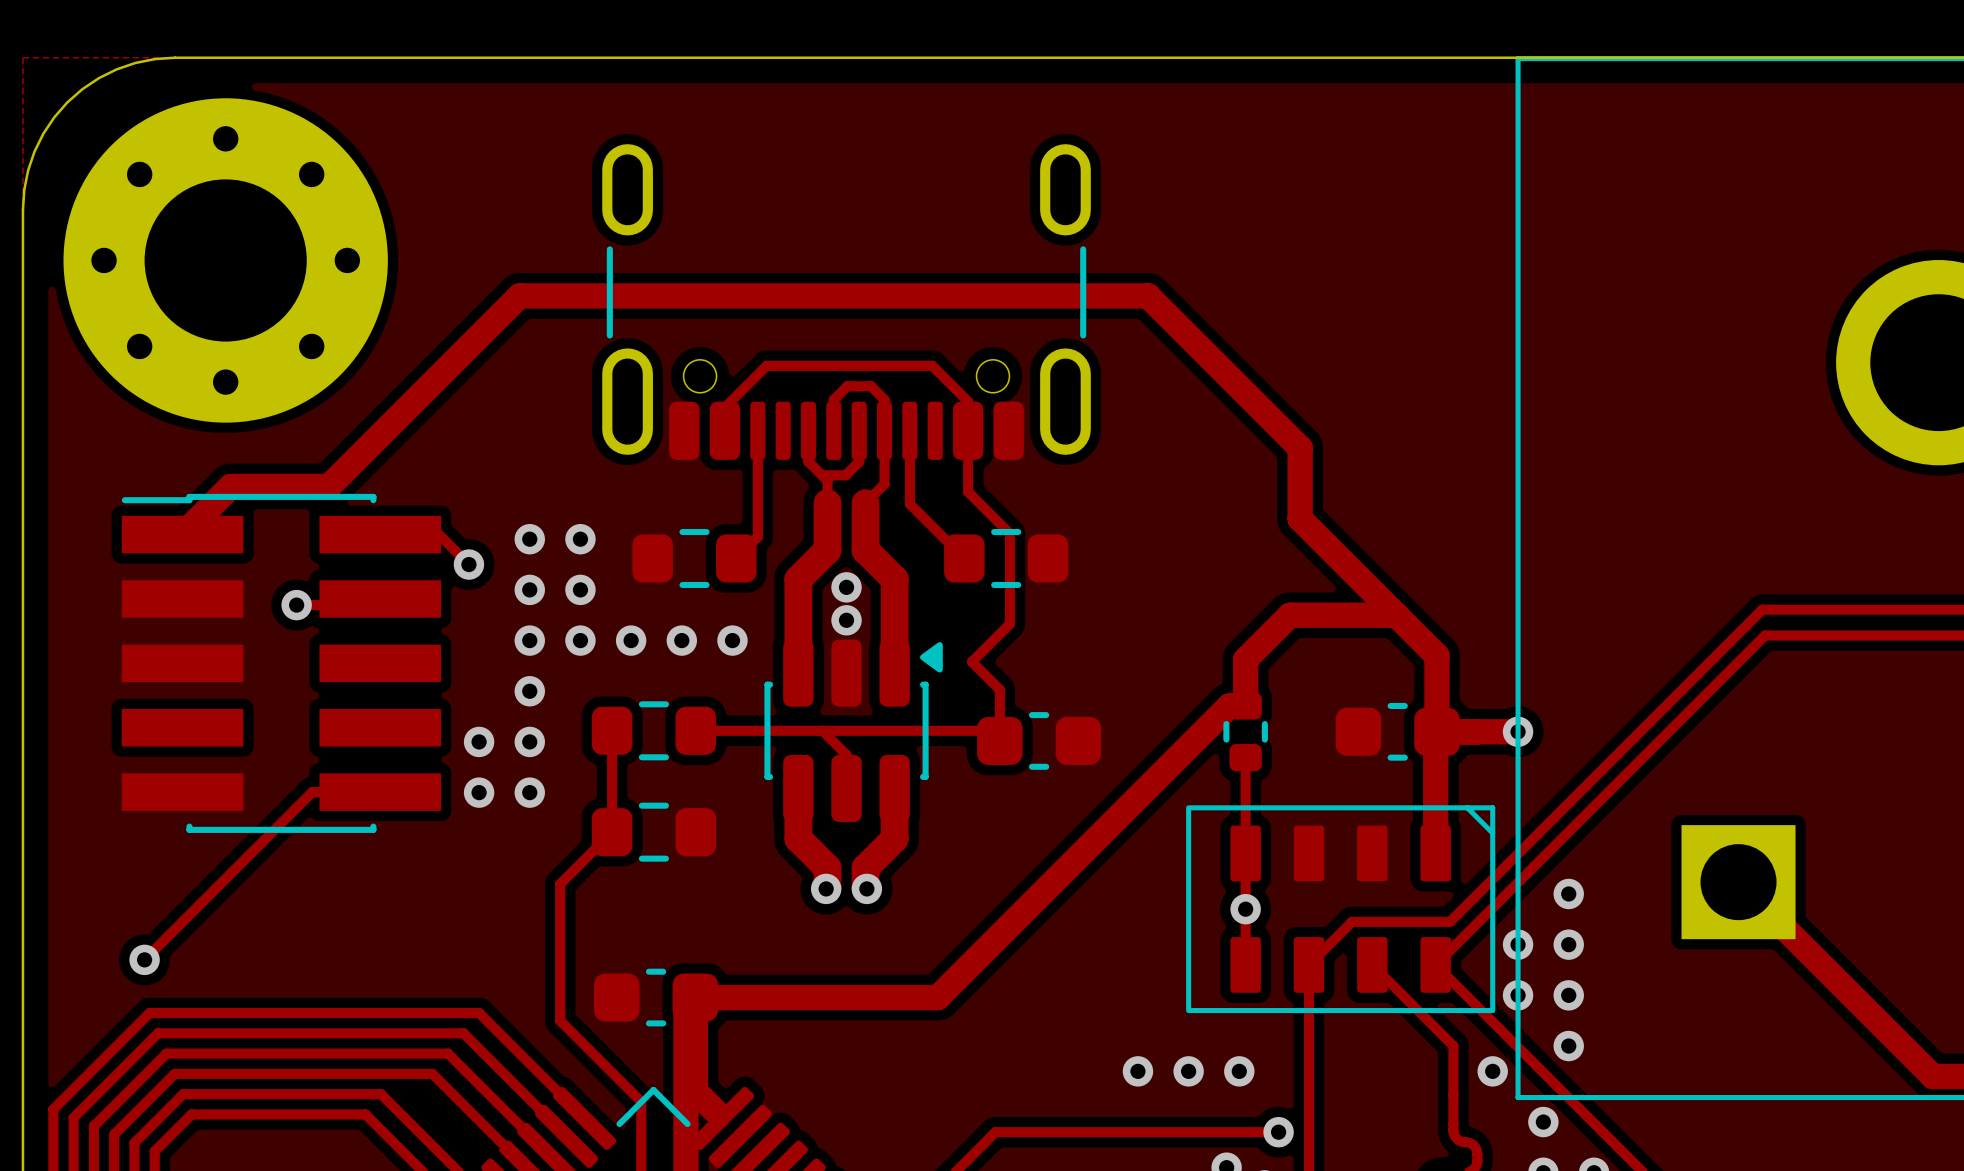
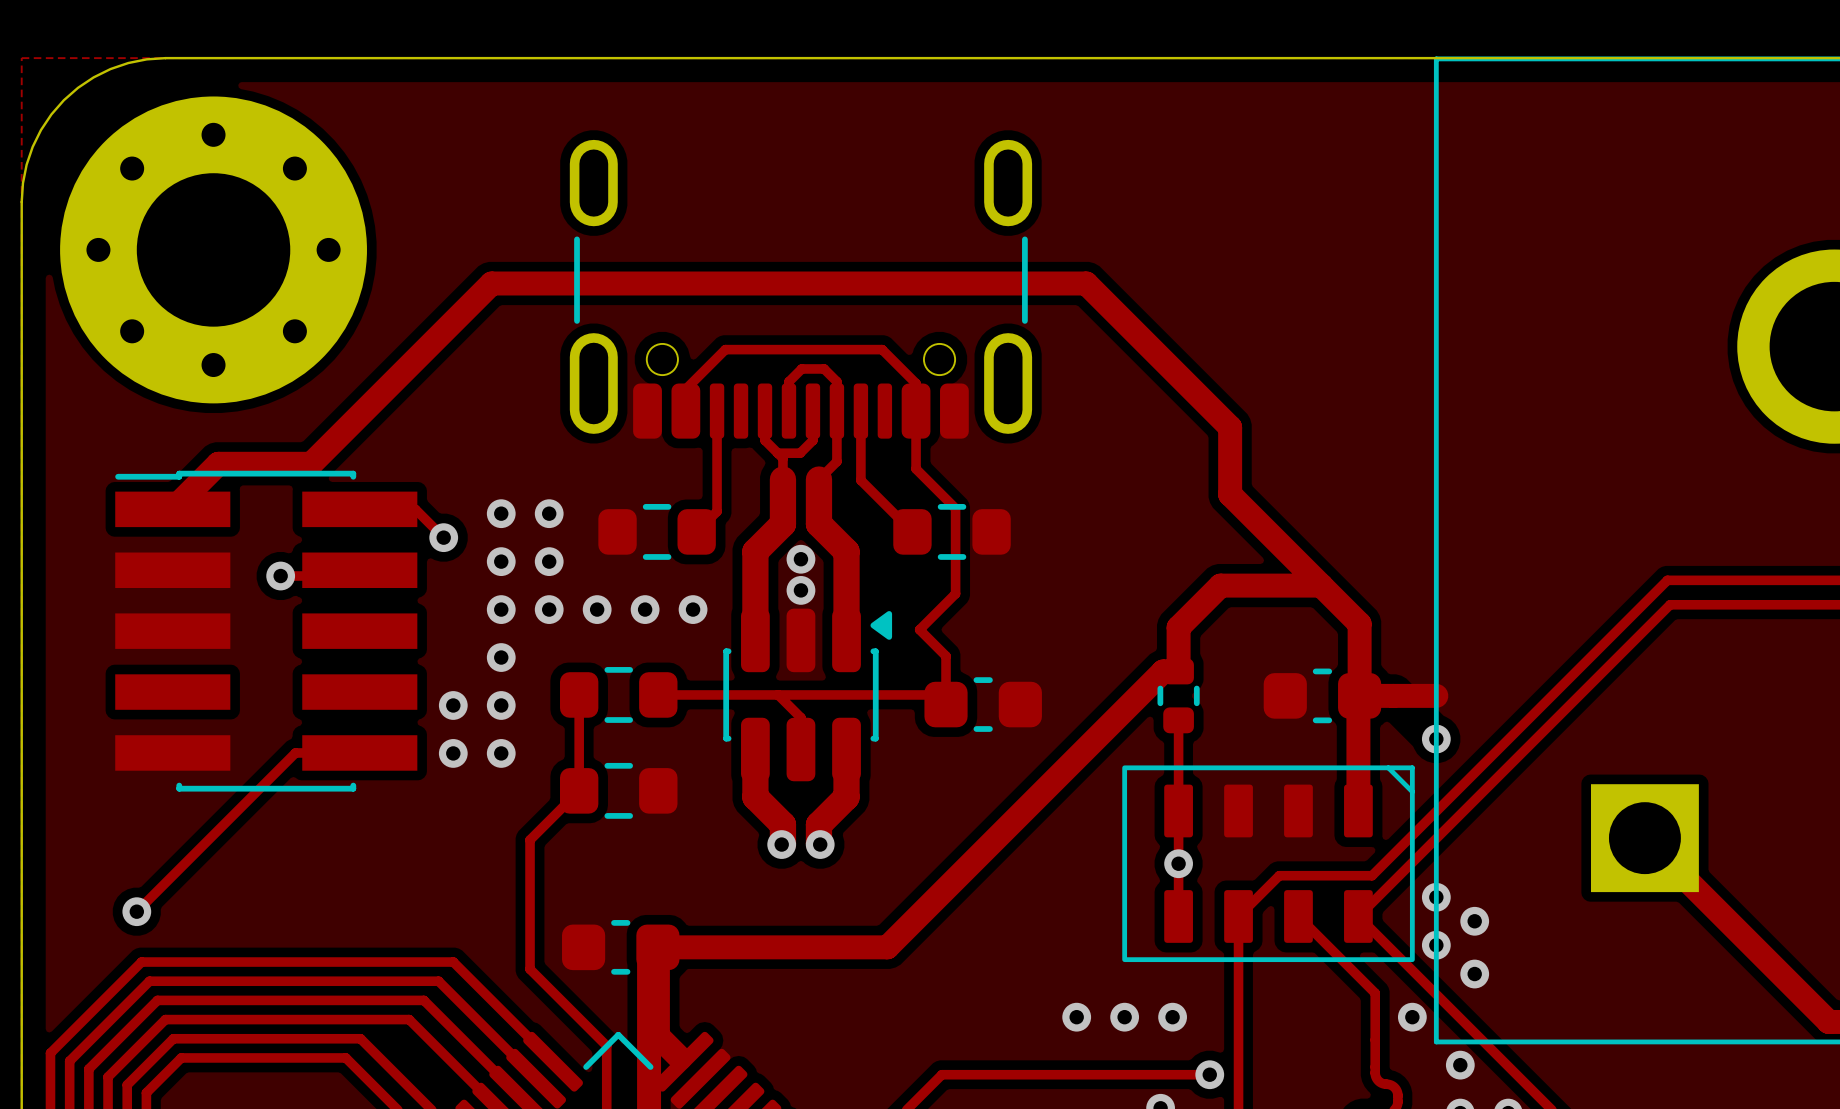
via position: (1518, 731) -> (1436, 739)
via: (1568, 893) -> none
via: (1568, 944) -> none
via: none -> (1474, 921)
via: (1568, 995) -> none
via: none -> (1474, 974)
via: (1568, 1046) -> none

